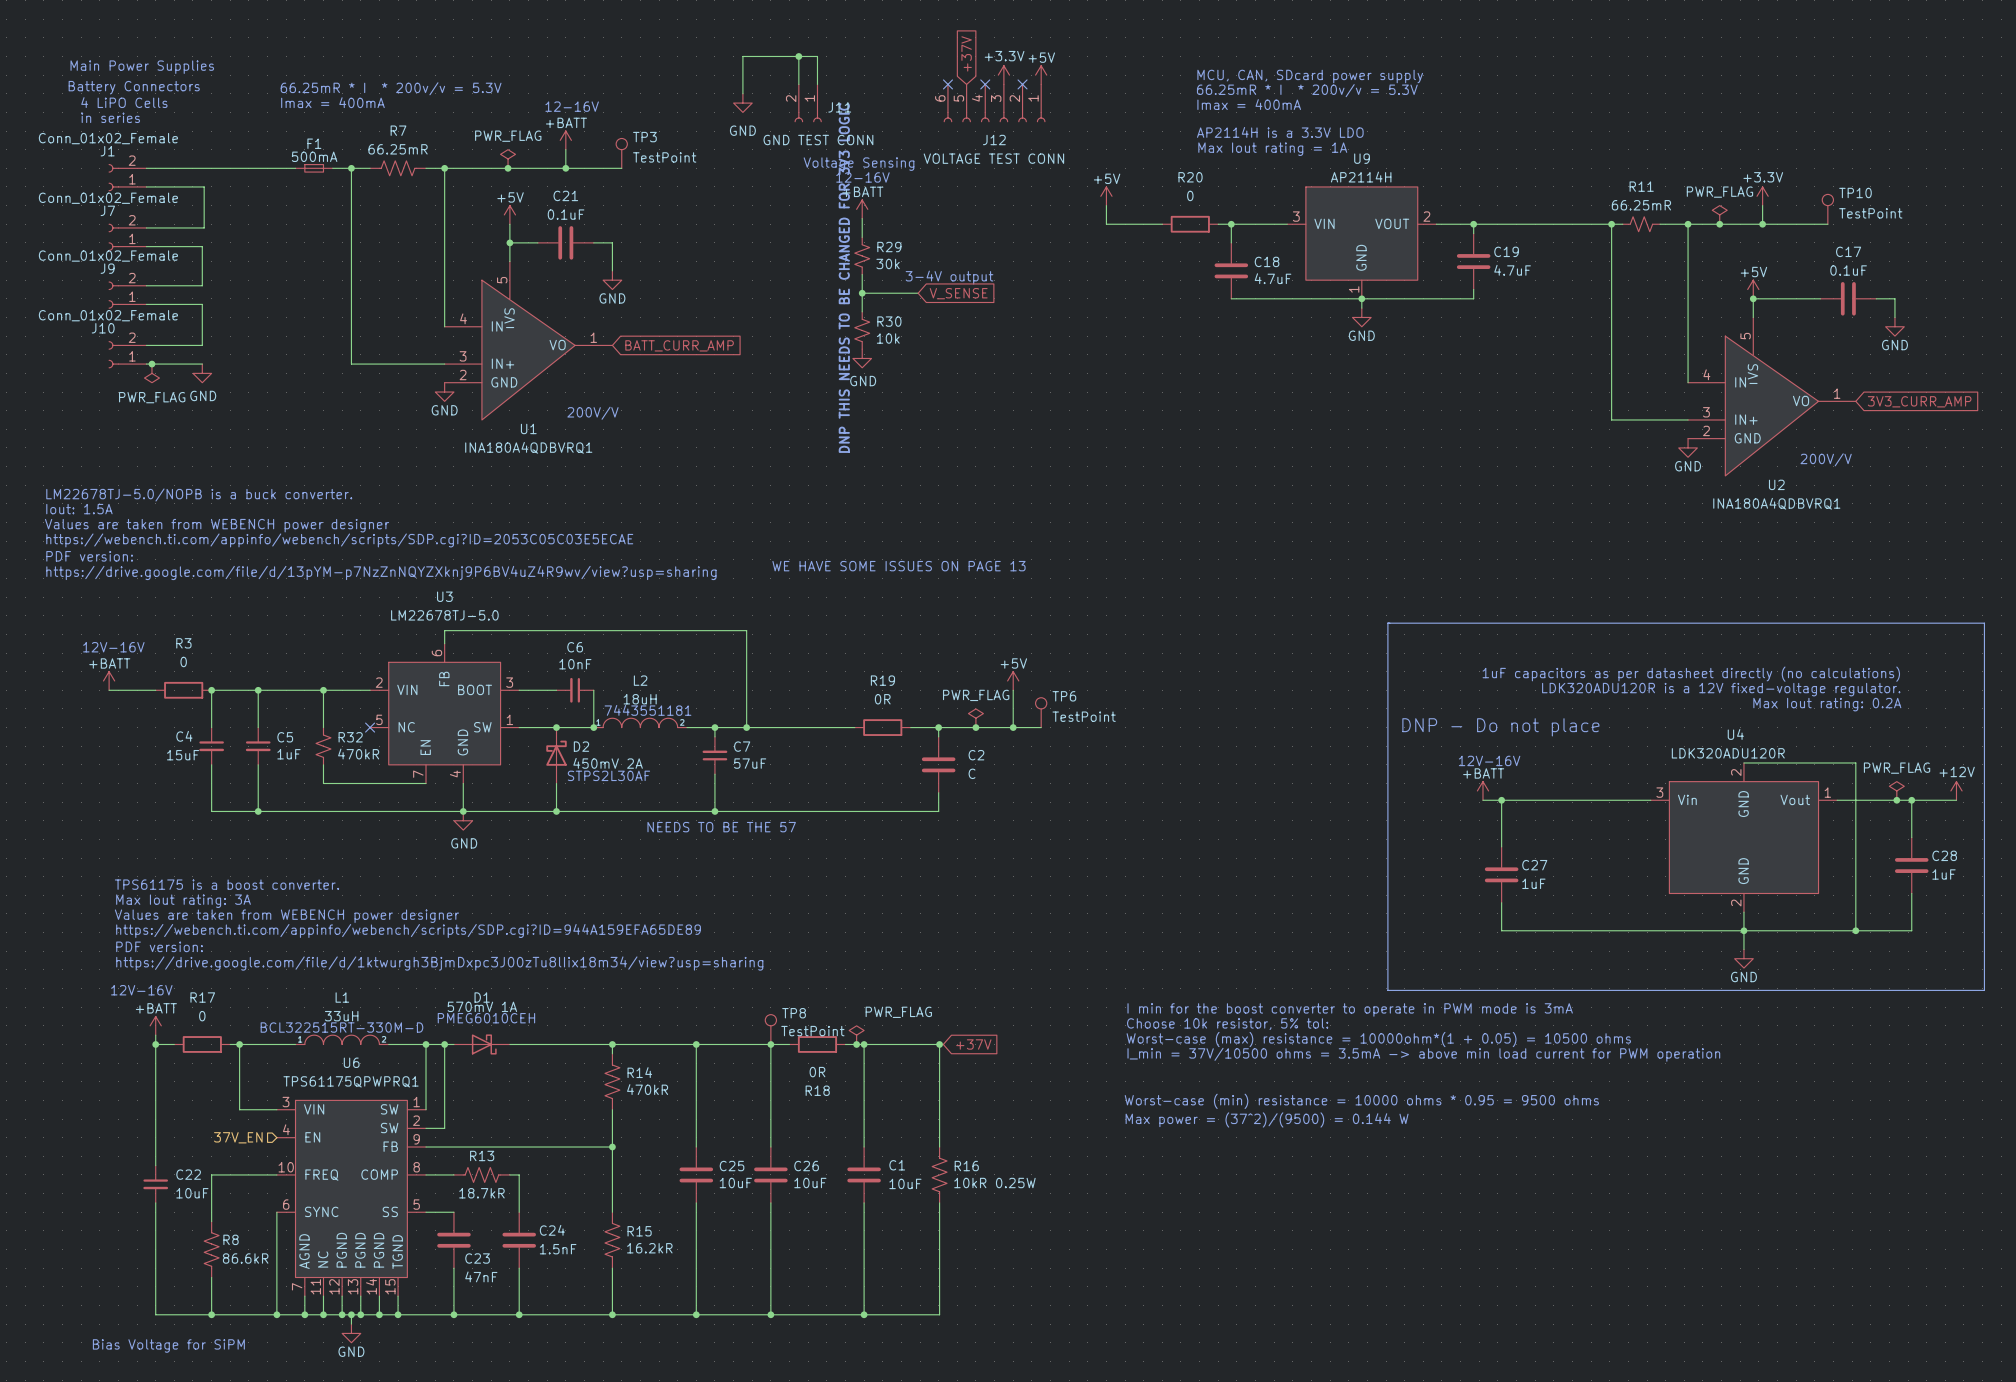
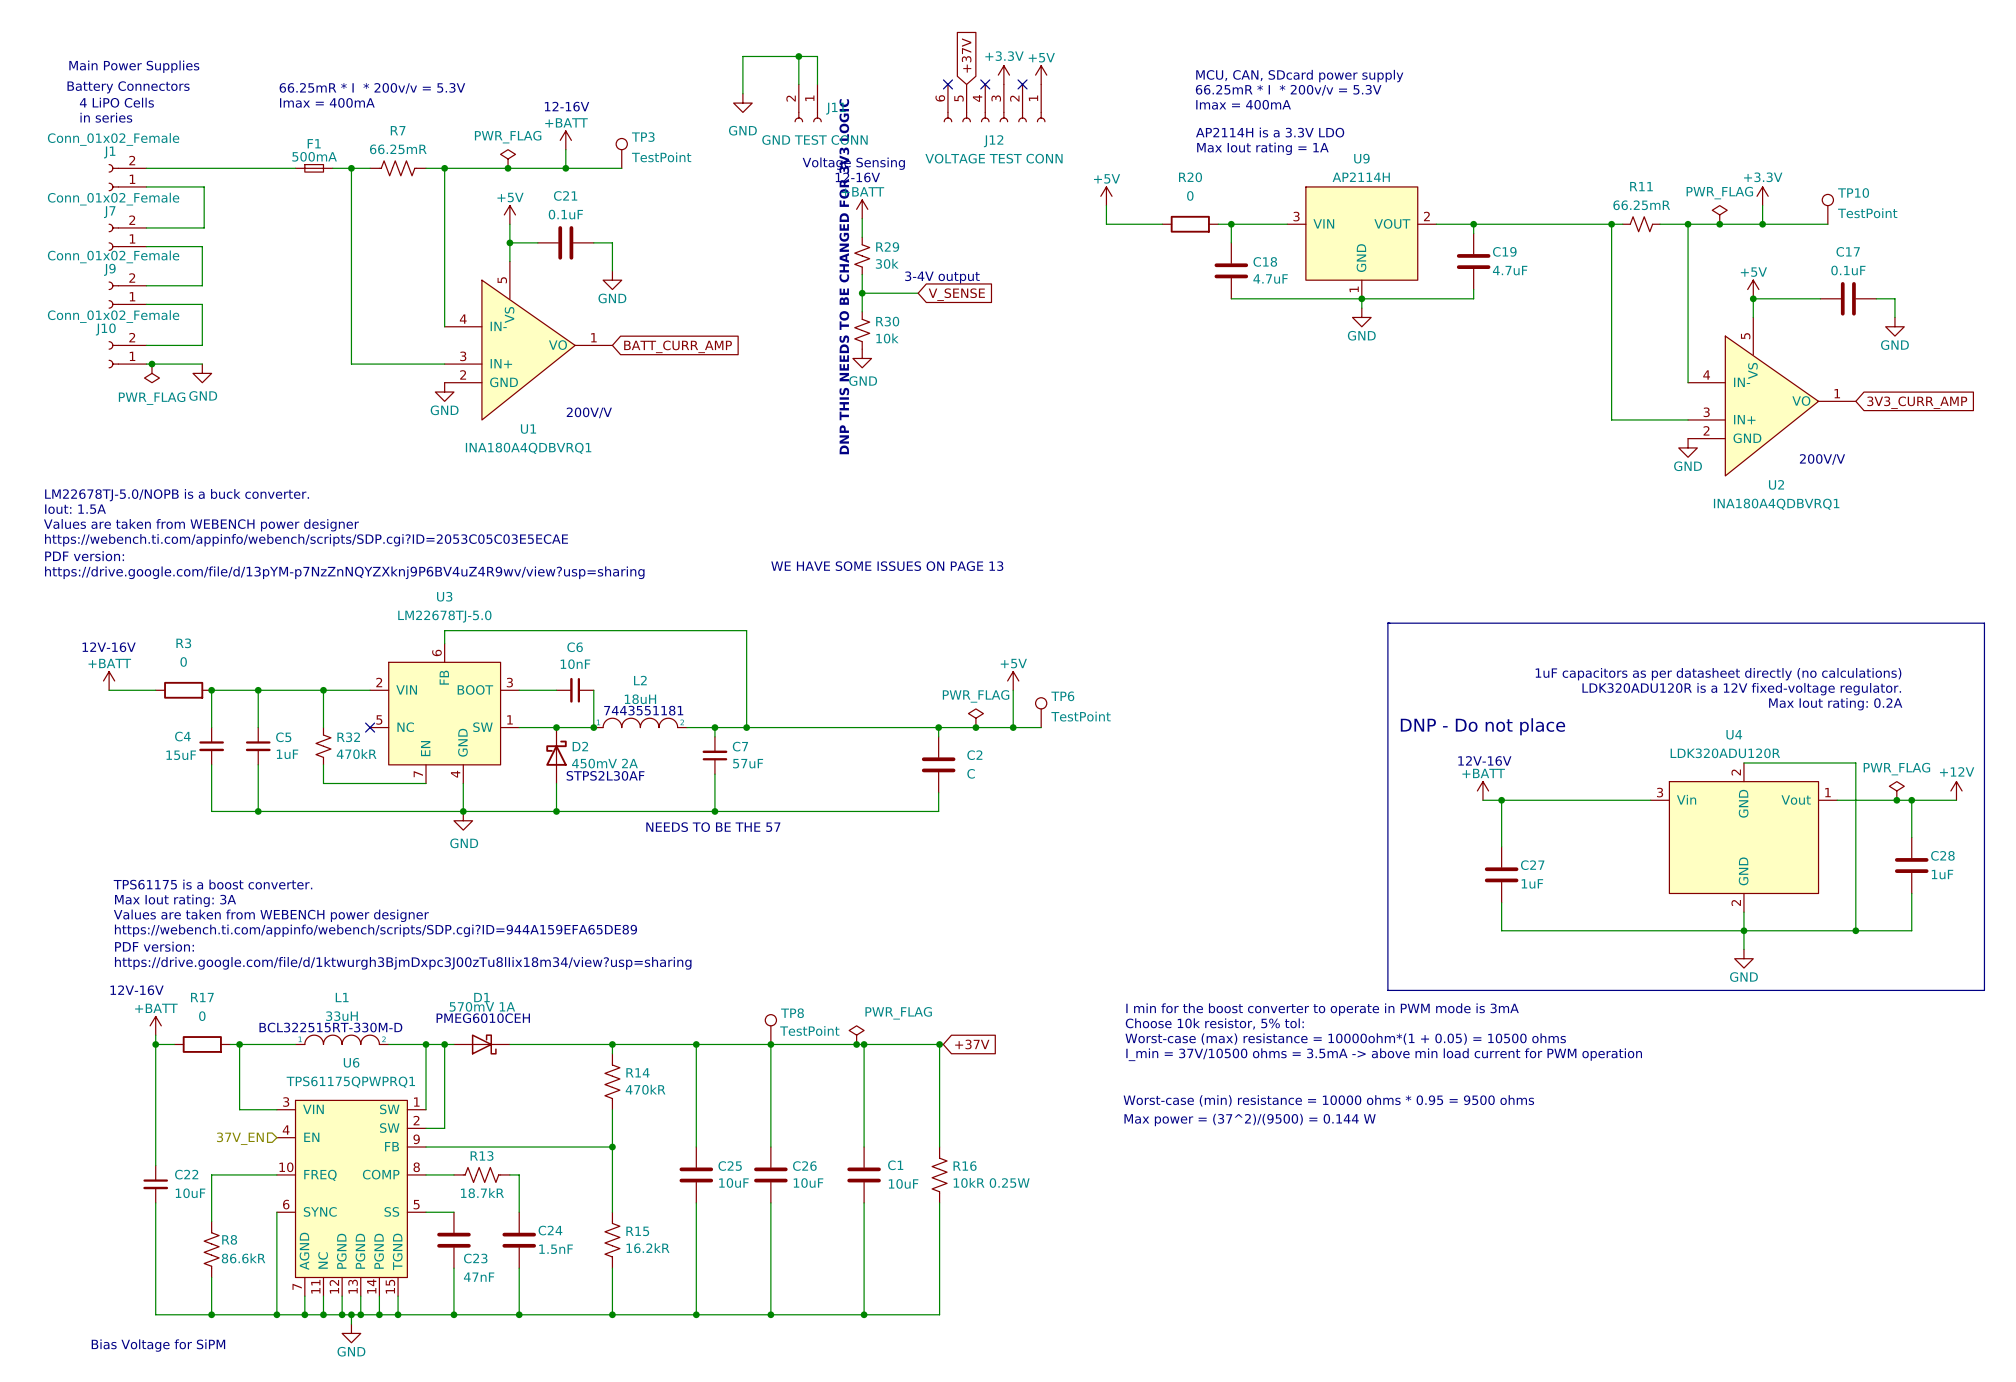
wire: none -> (854, 727) (910, 727)
R19: 0R (882, 727) -> none
wire: none -> (789, 1044) (845, 1044)
R18: 0R (817, 1044) -> none

